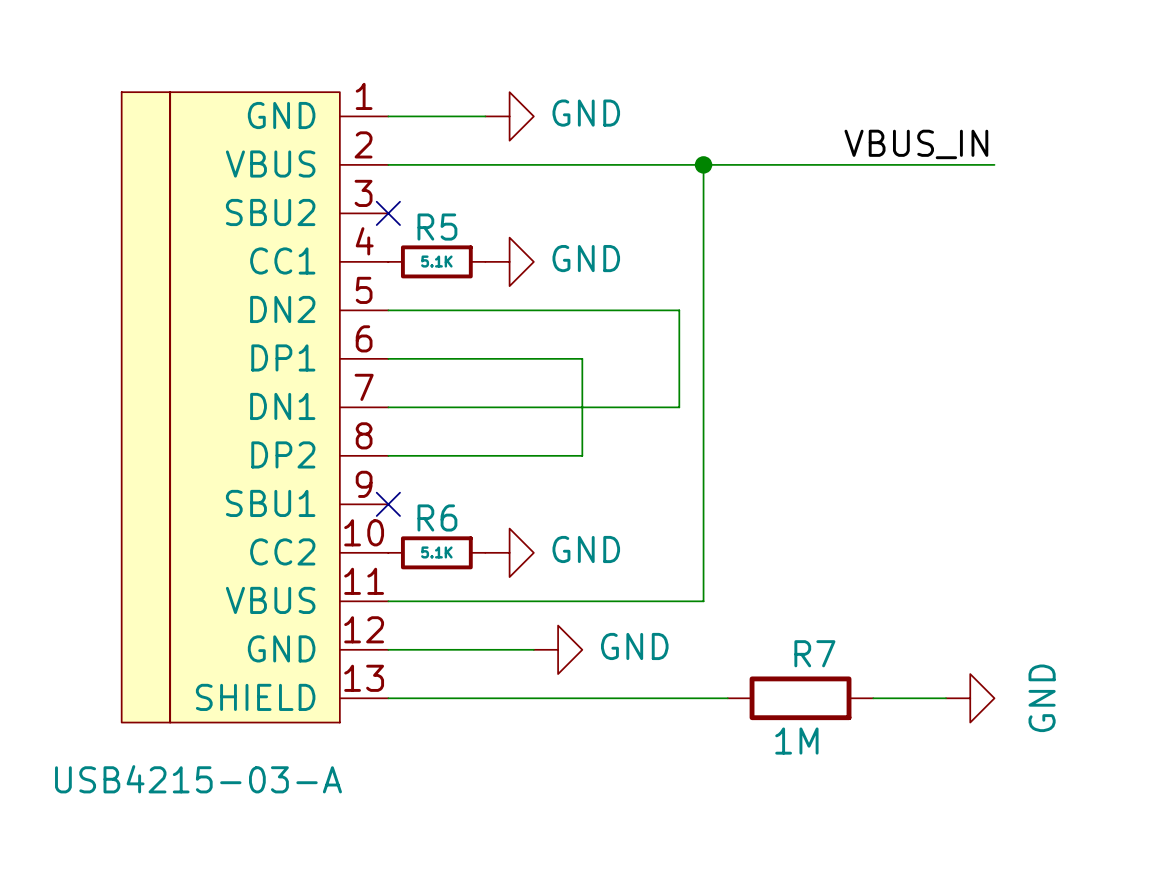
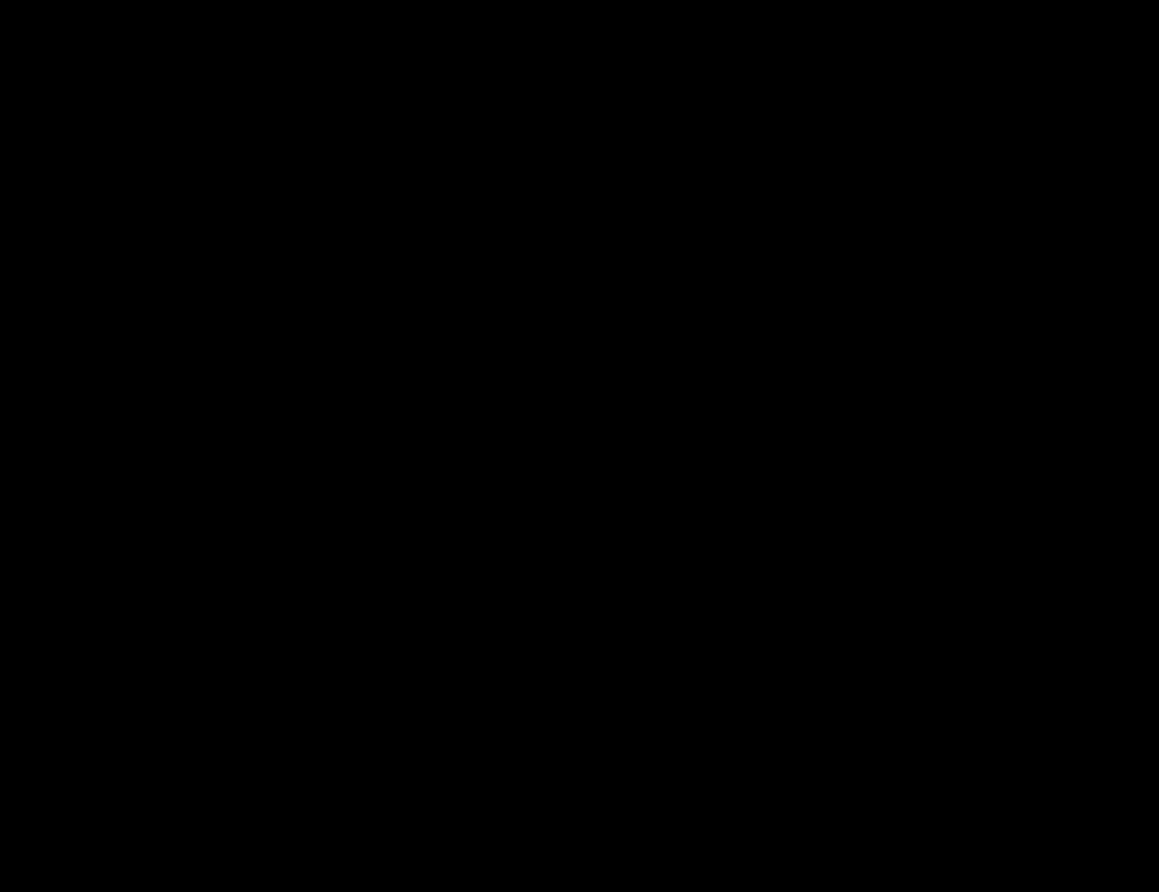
wire: (388, 116) (485, 116) -> none
power symbol: GND (509, 116) -> none
label: VBUS_IN (916, 144) -> none
wire: (388, 164) (994, 164) -> none
wire: (703, 164) (703, 601) (388, 601) -> none
junction: (703, 164) -> none
no-connect mark: (388, 213) -> none
R5: 5.1K (436, 261) -> none
power symbol: GND (509, 261) -> none
wire: (388, 310) (679, 310) (679, 407) (388, 407) -> none
wire: (388, 358) (582, 358) (582, 455) (388, 455) -> none
part: USB4215-03-A (255, 407) -> none
no-connect mark: (388, 504) -> none
R6: 5.1K (436, 552) -> none
power symbol: GND (509, 552) -> none
wire: (388, 649) (533, 649) -> none
power symbol: GND (558, 649) -> none
wire: (388, 698) (727, 698) -> none
R7: 1M (800, 698) -> none
wire: (873, 698) (946, 698) -> none
power symbol: GND (970, 698) -> none

